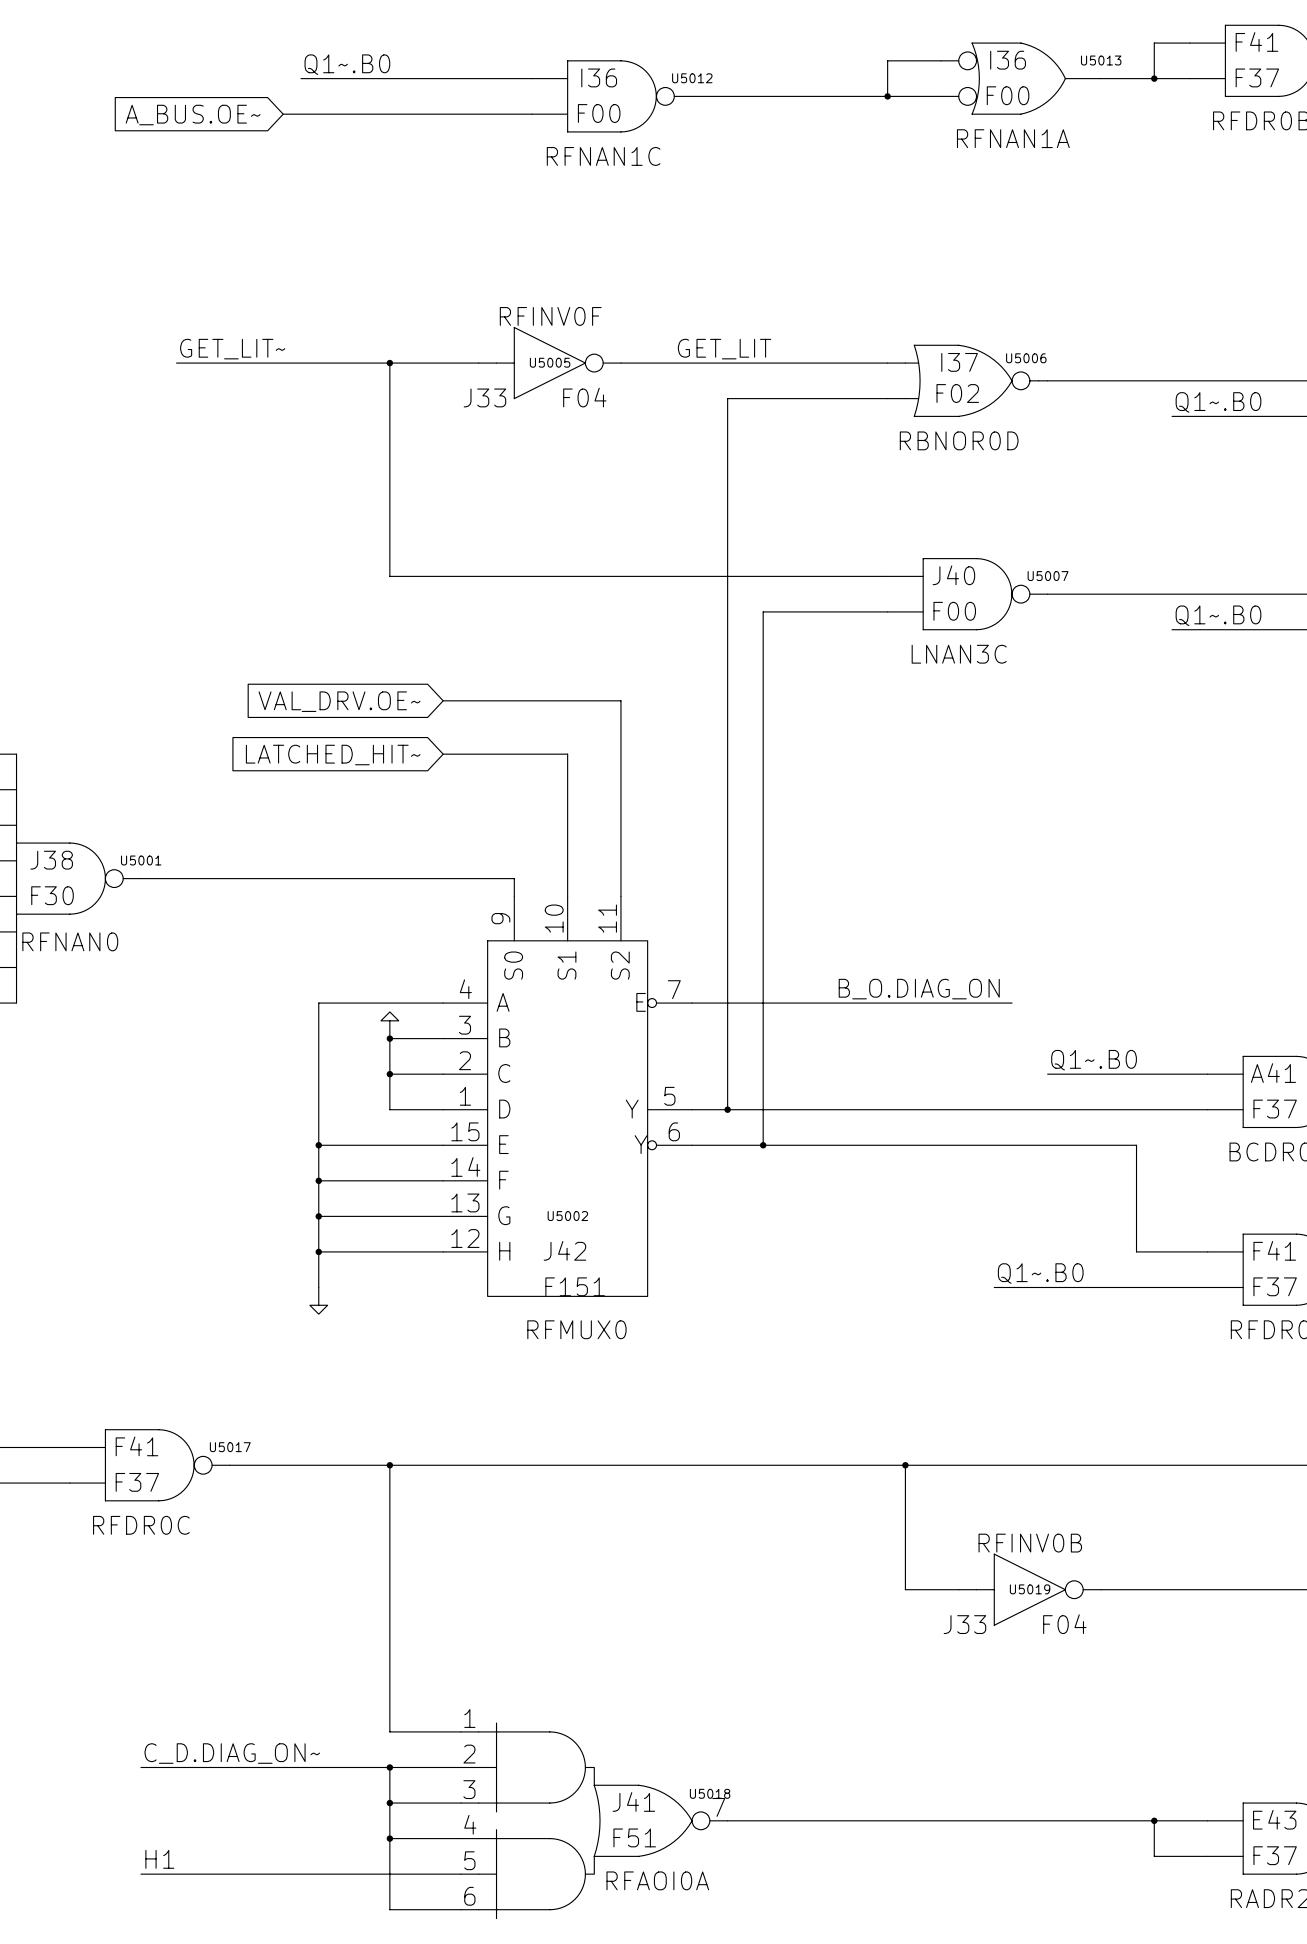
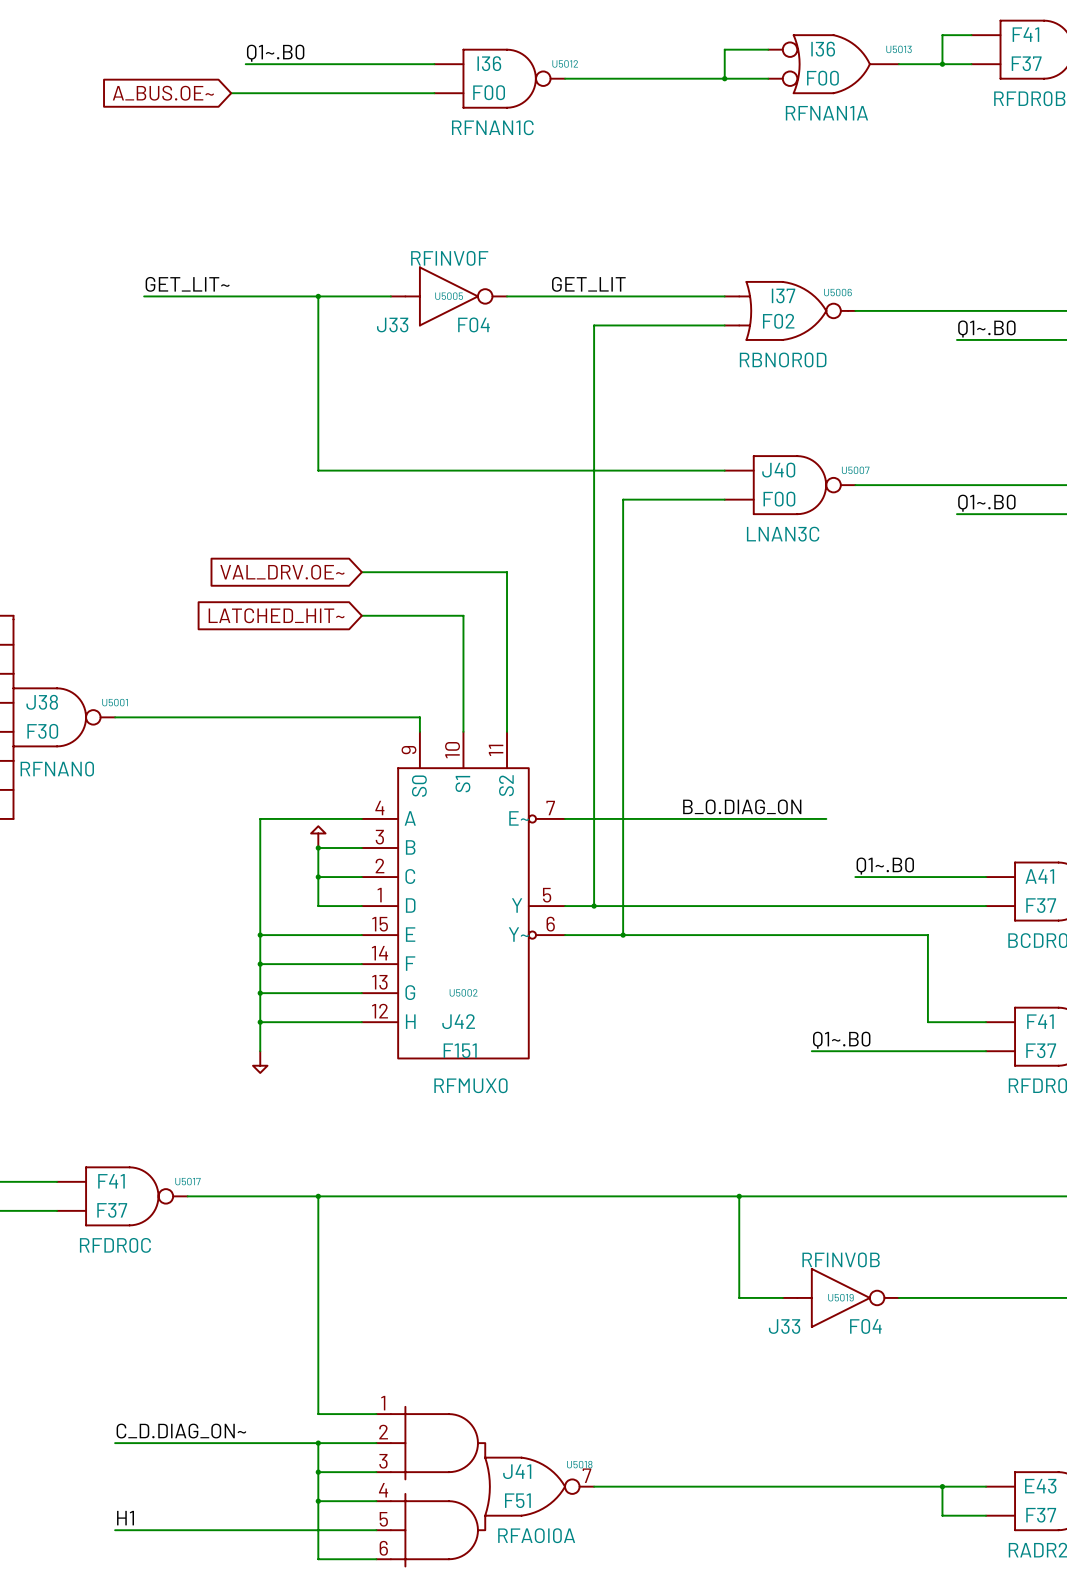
U5002 pin name: E (641, 1002) -> E~ (519, 818)
U5002 pin name: Y (641, 1144) -> Y~ (519, 934)

